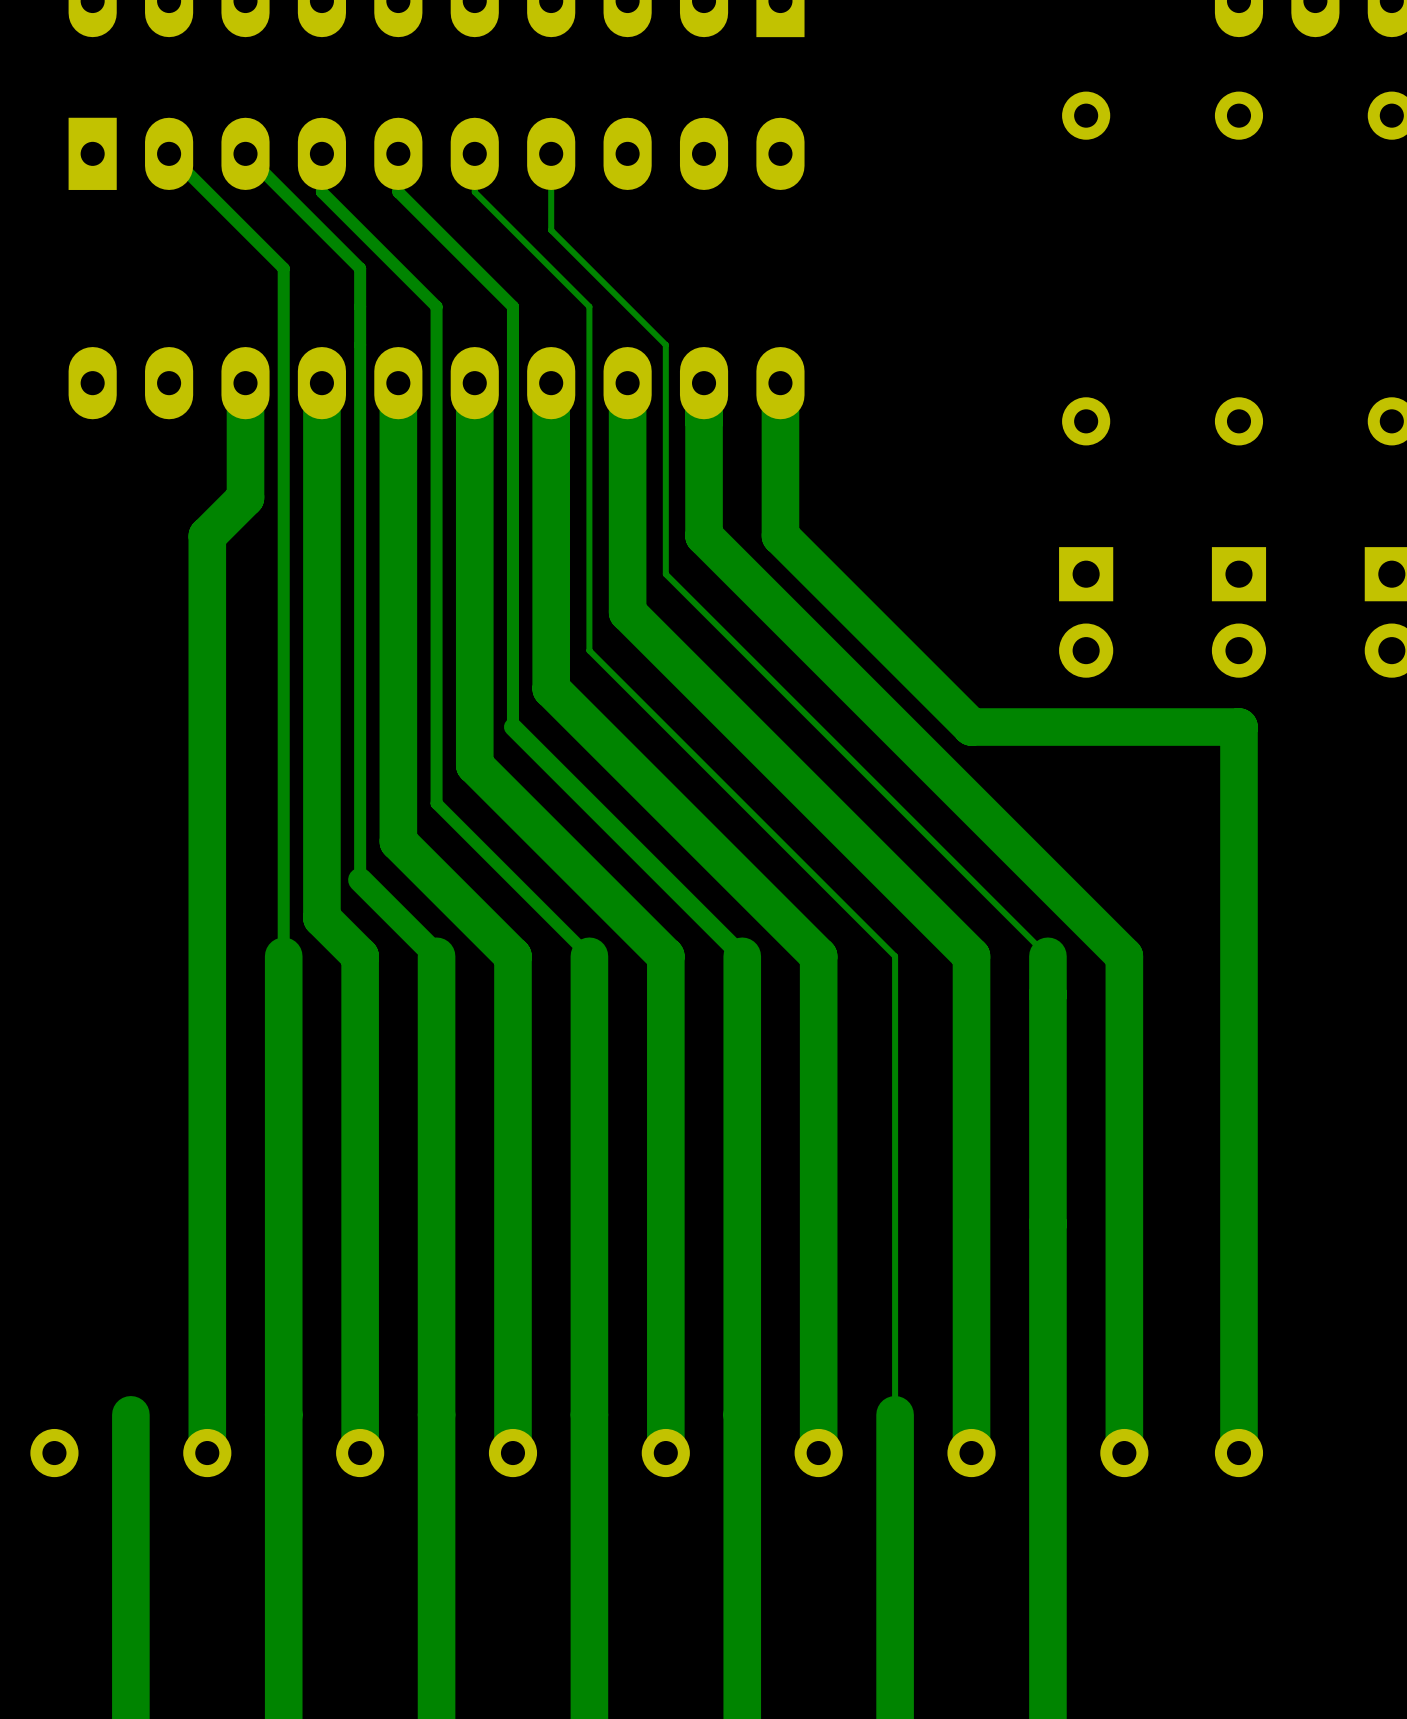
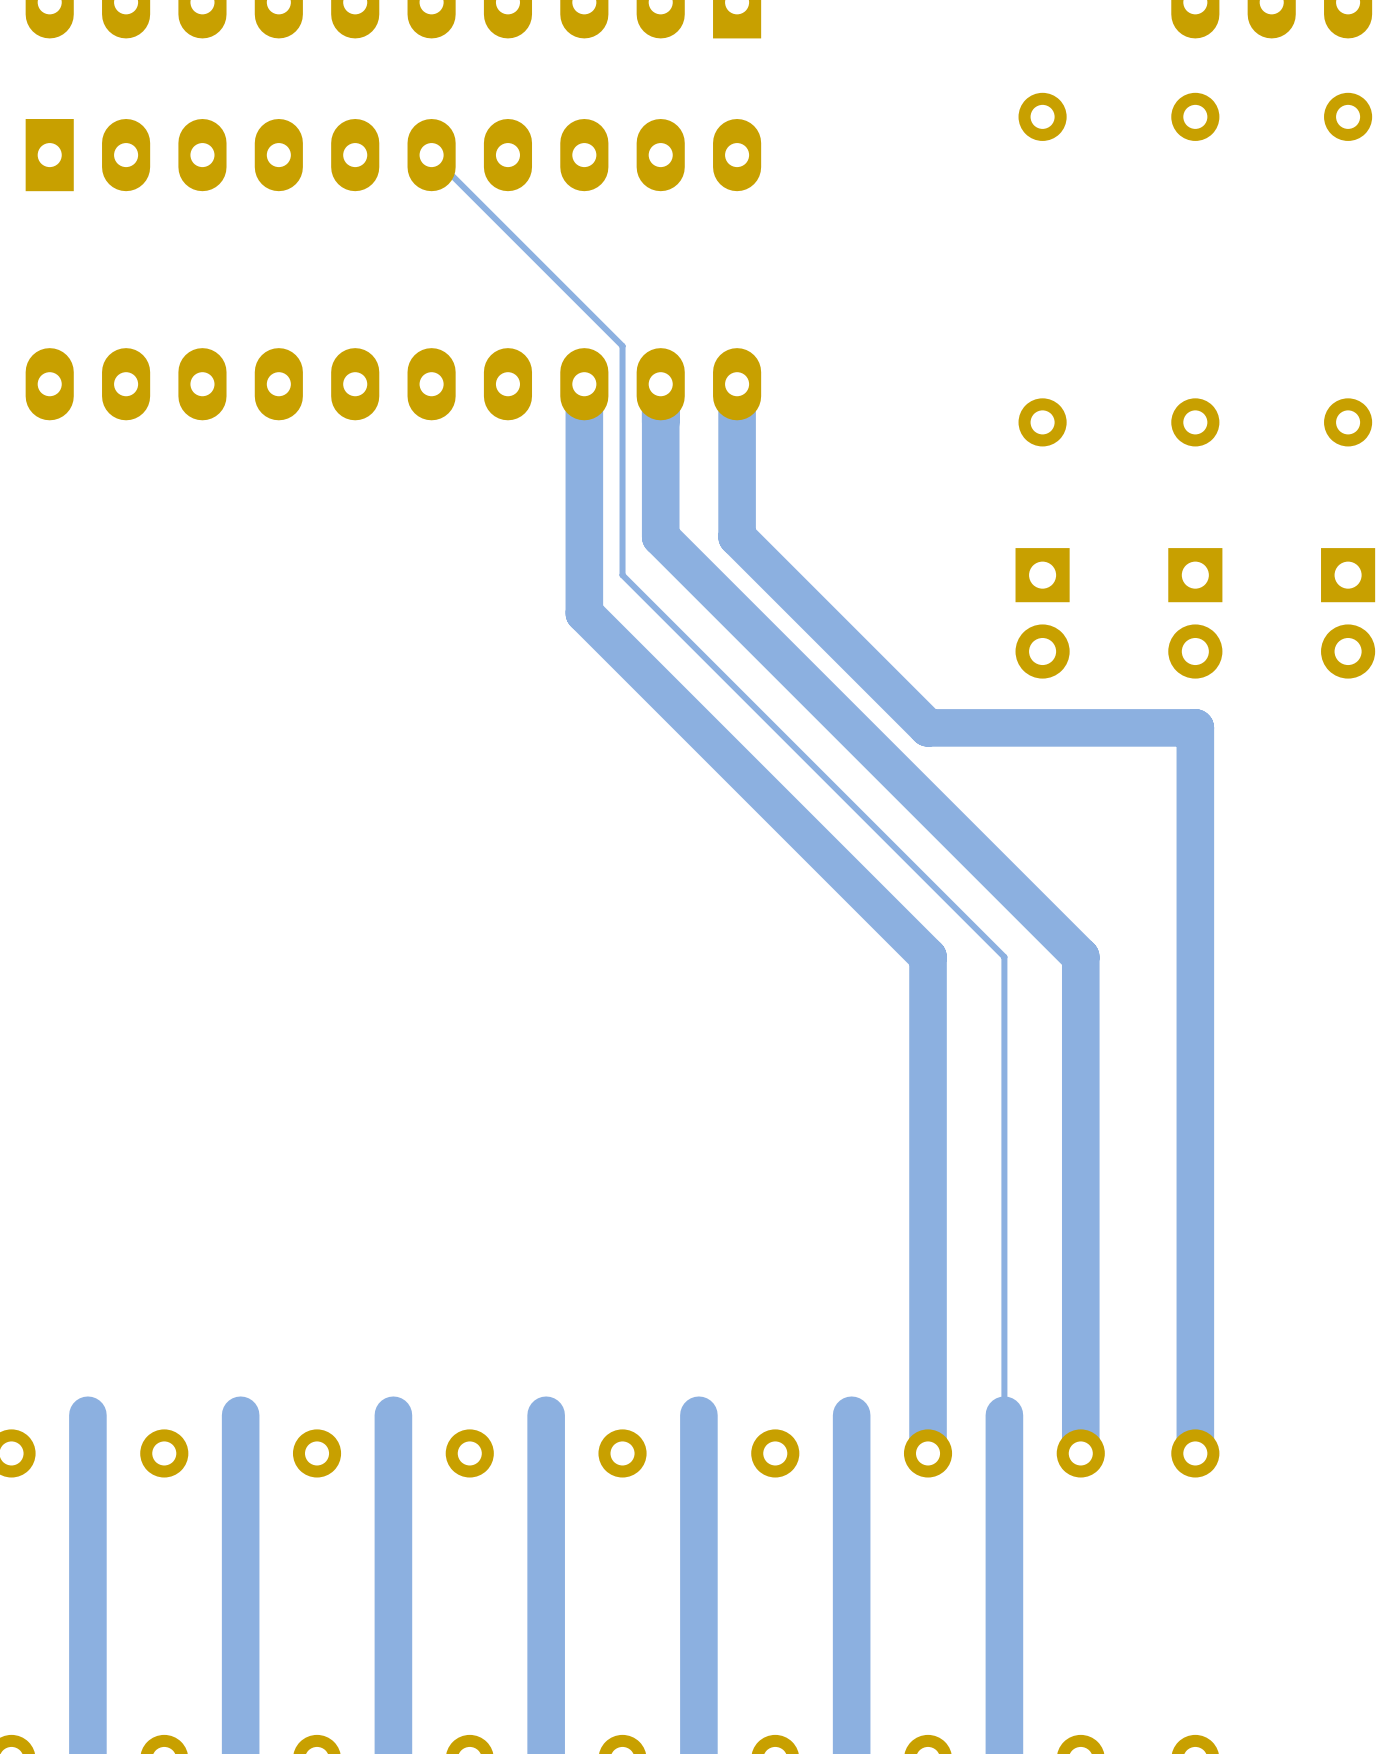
bottom track: (169, 153) (283, 268) (283, 1414) -> none
bottom track: (245, 153) (360, 268) (360, 879) (436, 956) (436, 1414) -> none
bottom track: (321, 153) (321, 192) (436, 306) (436, 803) (589, 956) (589, 1414) -> none
bottom track: (398, 153) (398, 192) (512, 306) (512, 727) (742, 956) (742, 1414) -> none
bottom track: (474, 153) (474, 192) (589, 306) (589, 650) (895, 956) (895, 1414) -> none
bottom track: (551, 153) (551, 230) -> (431, 155) (507, 231)
bottom track: (245, 383) (245, 497) (207, 535) (207, 1453) -> none
bottom track: (321, 383) (321, 918) (360, 956) (360, 1453) -> none
bottom track: (398, 383) (398, 841) (512, 956) (512, 1453) -> none
bottom track: (474, 383) (474, 765) (665, 956) (665, 1453) -> none
bottom track: (551, 383) (551, 688) (818, 956) (818, 1453) -> none
bottom track width: thick (1047, 956) (1047, 1414) -> thin (1004, 957) (1004, 1415)

